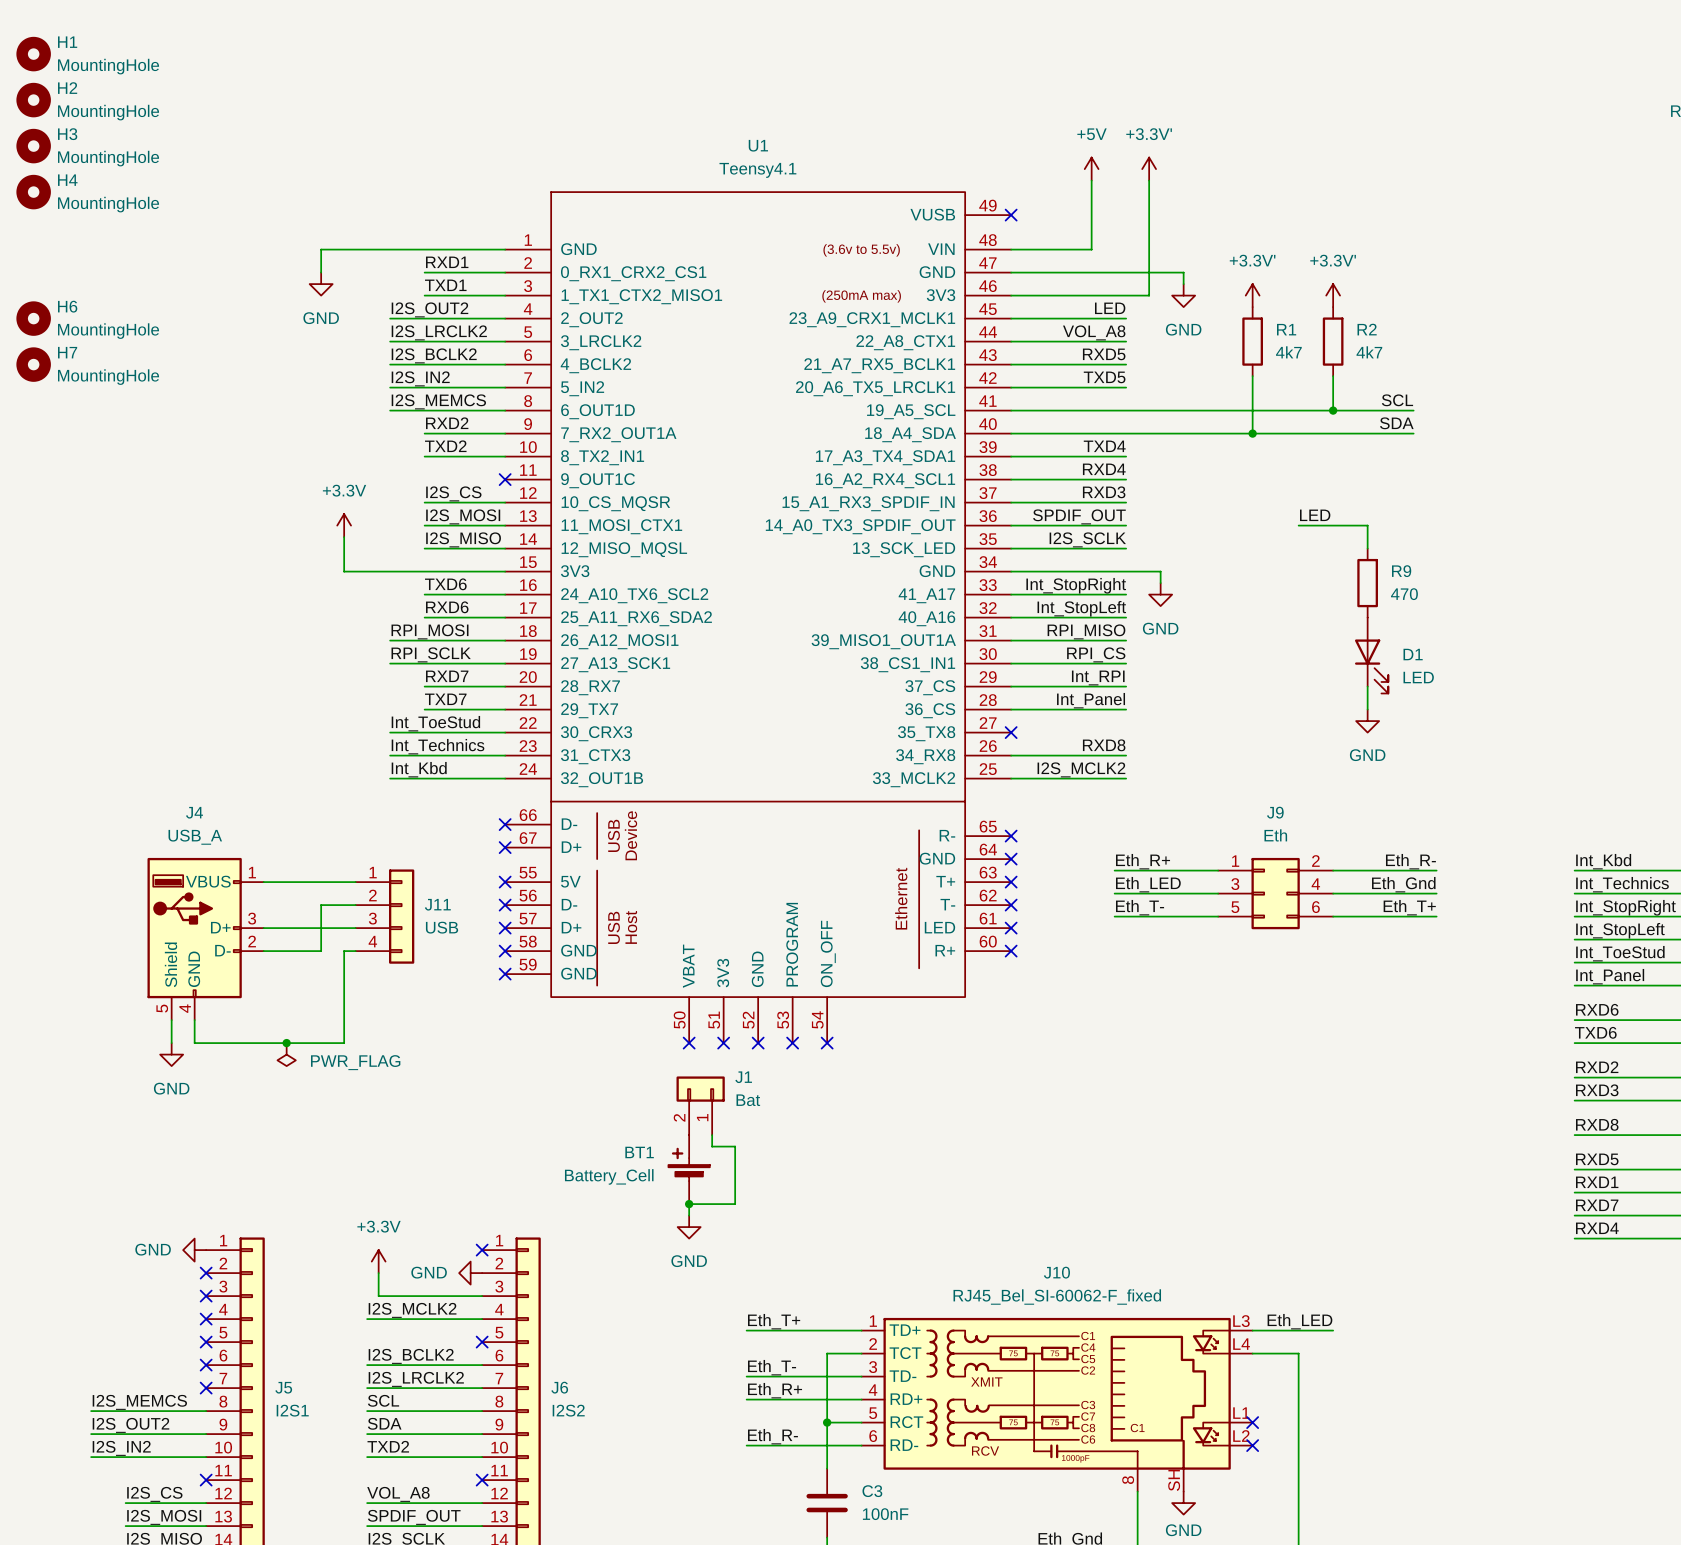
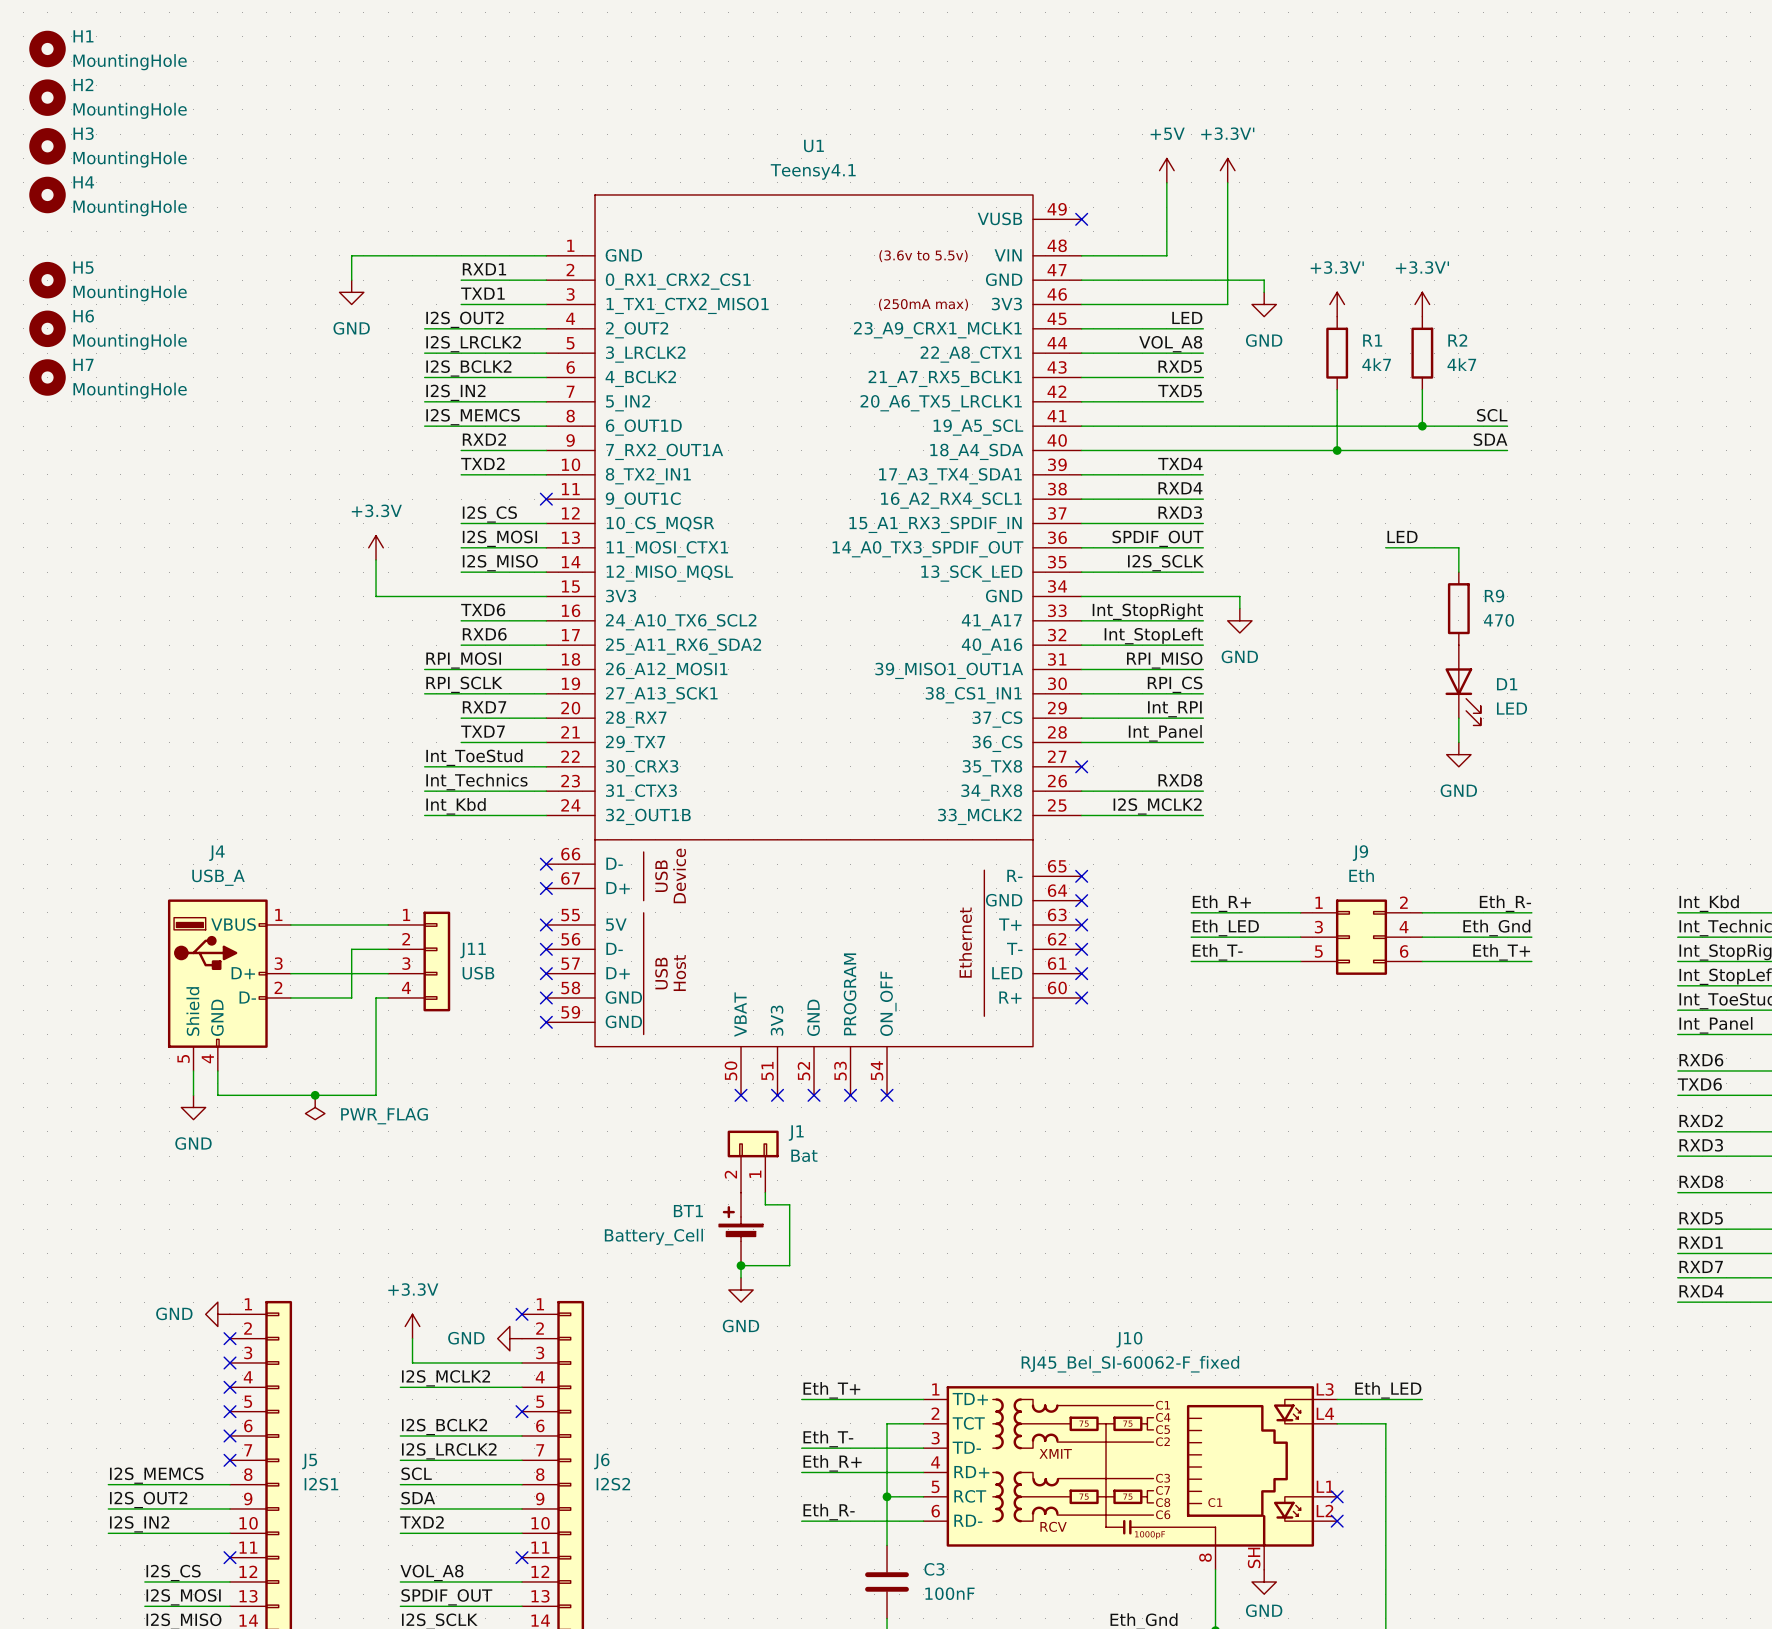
H5: none -> MountingHole (47, 280)

